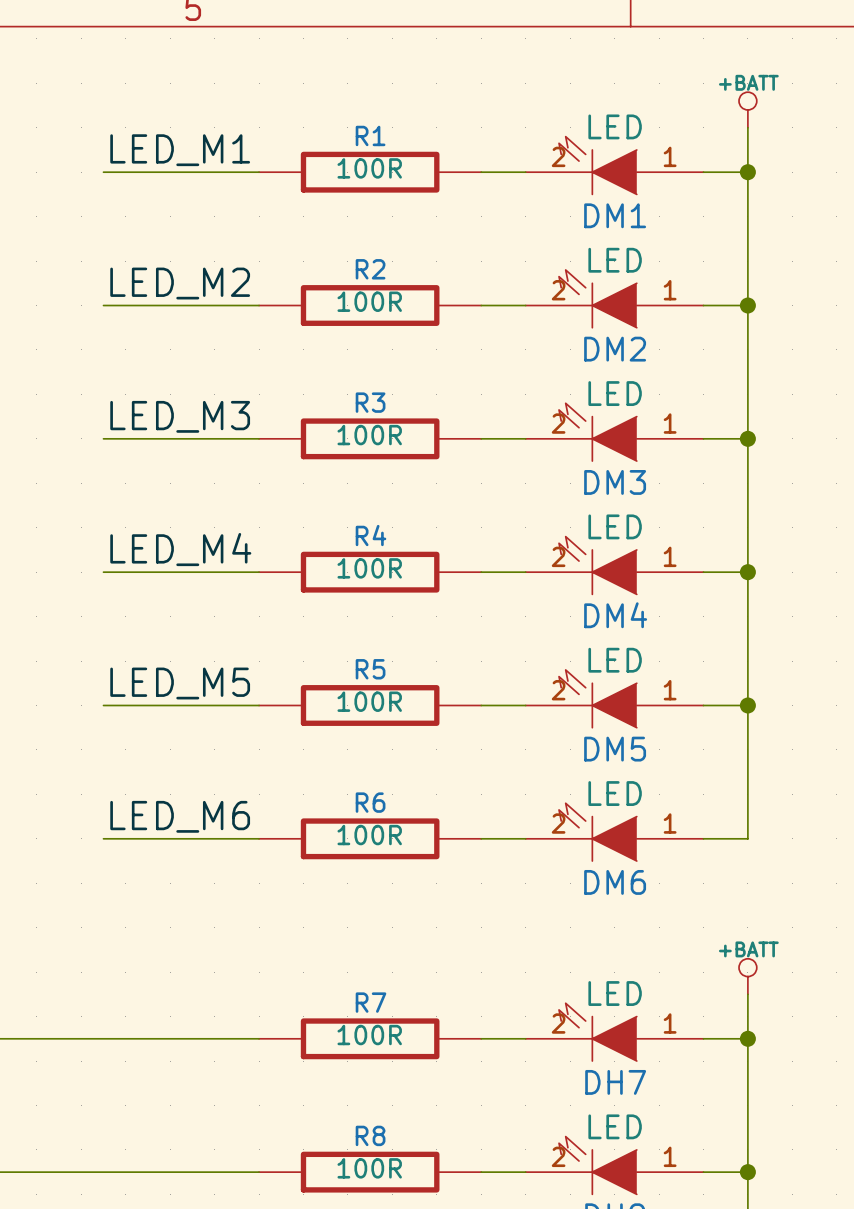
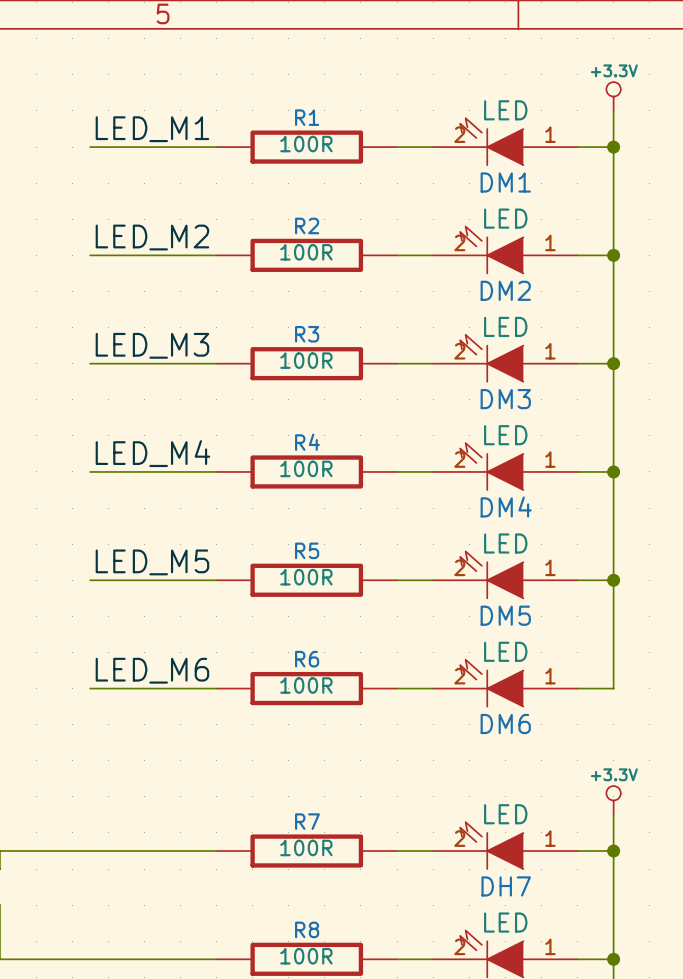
power symbol: +BATT (747, 109) -> +3.3V (613, 96)
power symbol: +BATT (747, 976) -> +3.3V (613, 800)

